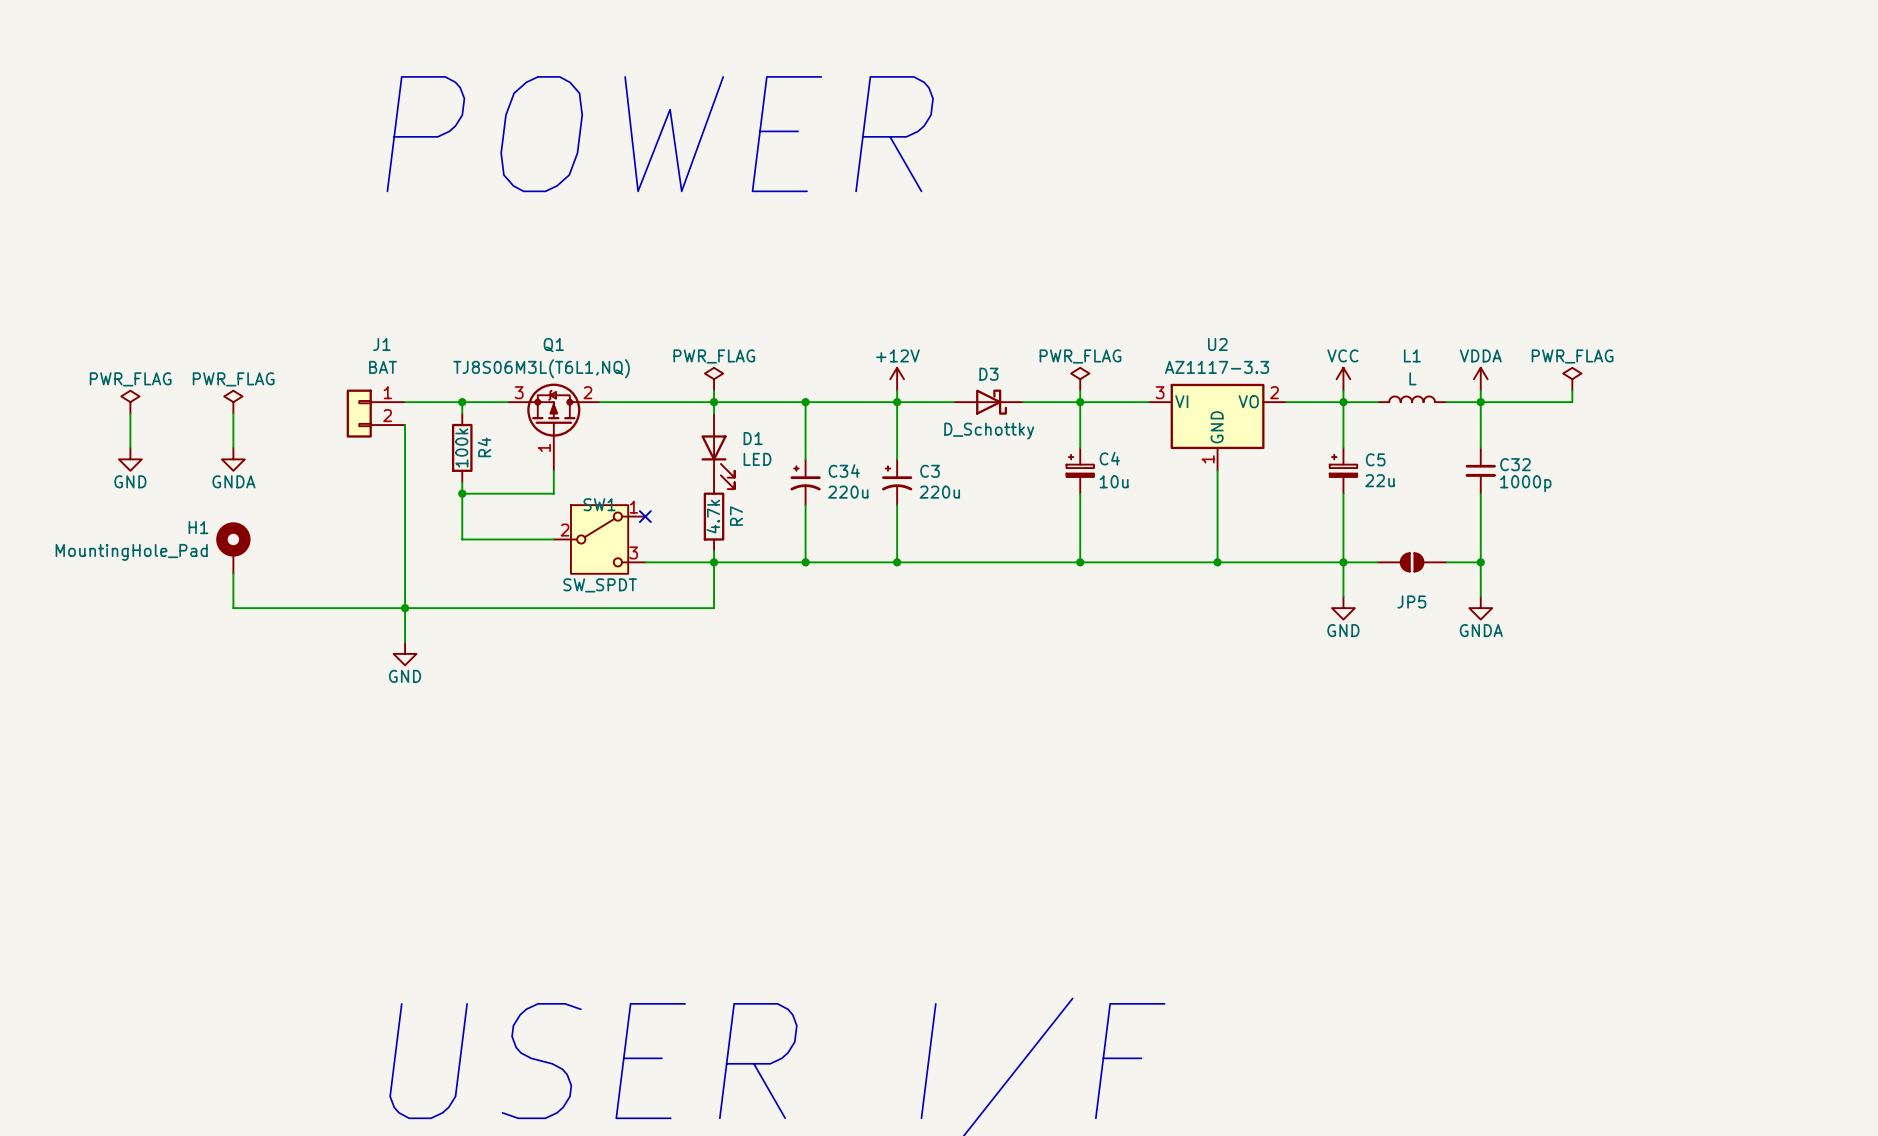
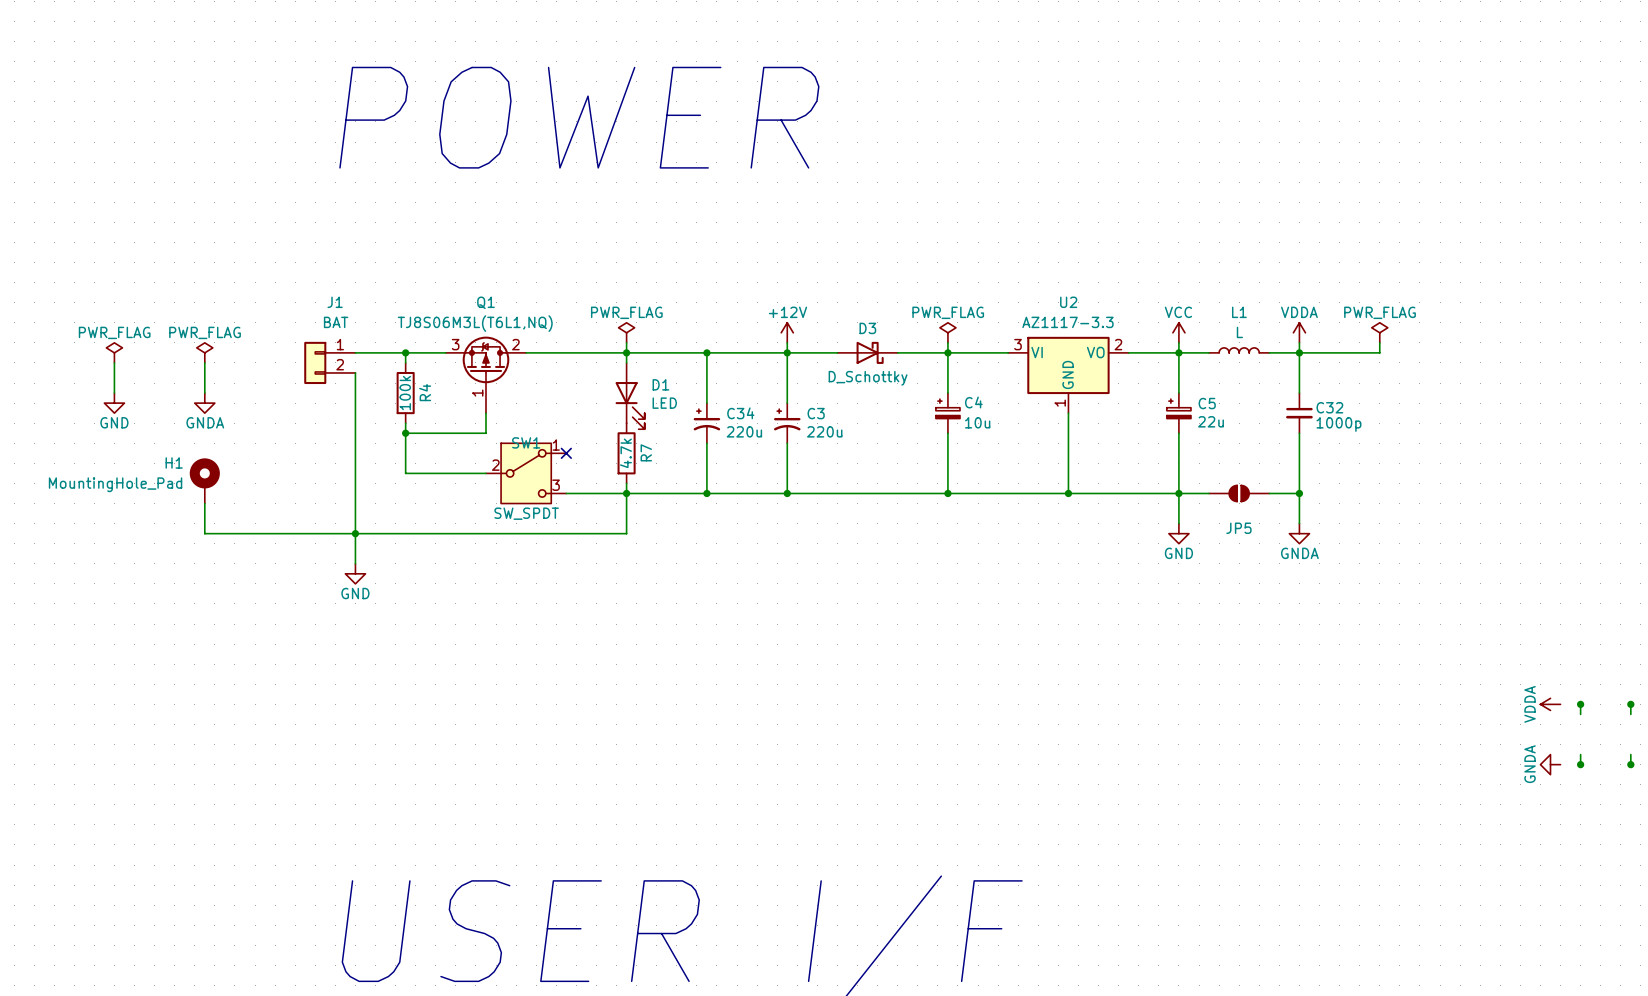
power symbol: none -> VDDA (1550, 704)
wire: none -> (1580, 704) (1580, 714)
junction: none -> (1580, 704)
wire: none -> (1630, 704) (1630, 714)
junction: none -> (1630, 704)
wire: none -> (1580, 754) (1580, 764)
wire: none -> (1630, 754) (1630, 764)
power symbol: none -> GNDA (1550, 764)
junction: none -> (1580, 764)
junction: none -> (1630, 764)

